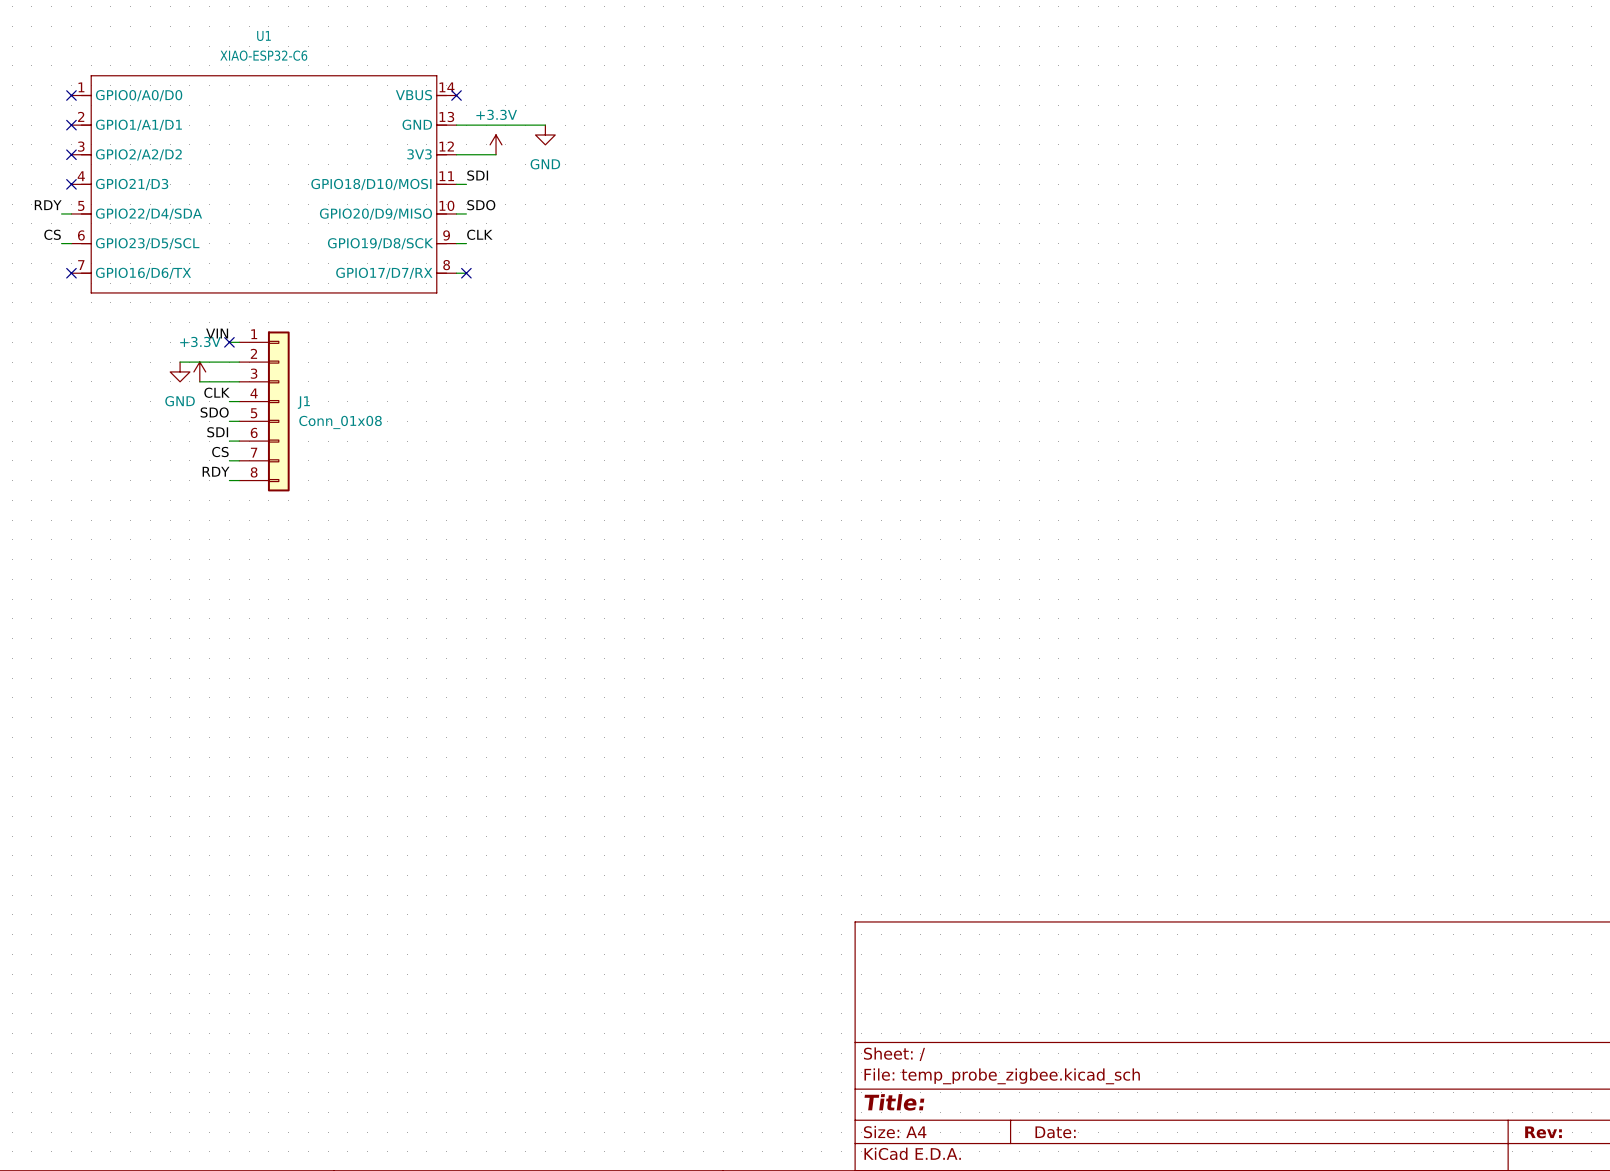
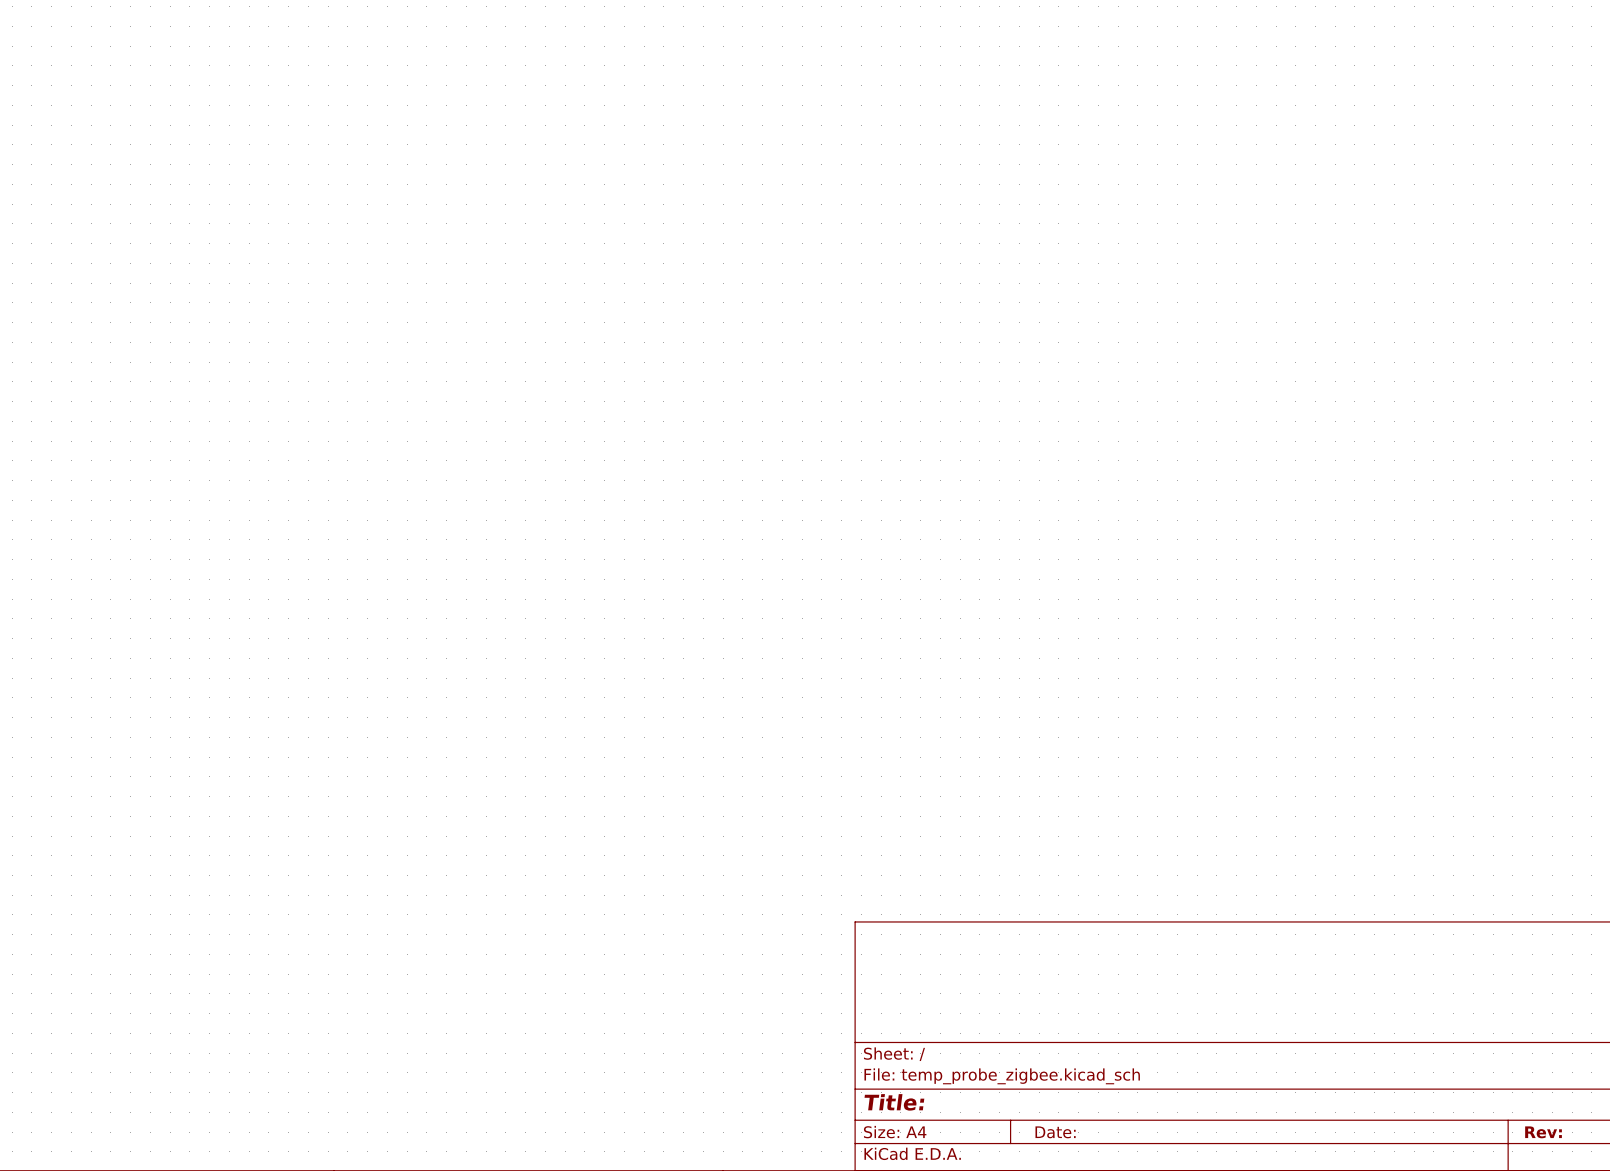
no-connect mark: (71, 95) -> none
no-connect mark: (456, 95) -> none
no-connect mark: (71, 125) -> none
wire: (456, 125) (545, 125) -> none
power symbol: GND (545, 135) -> none
power symbol: +3.3V (496, 144) -> none
no-connect mark: (71, 154) -> none
wire: (456, 154) (496, 154) -> none
label: SDI (477, 175) -> none
no-connect mark: (71, 184) -> none
U1: XIAO-ESP32-C6 (263, 184) -> none
wire: (456, 184) (466, 184) -> none
label: RDY (48, 205) -> none
label: SDO (481, 205) -> none
wire: (61, 213) (71, 213) -> none
wire: (456, 213) (466, 213) -> none
label: CS (52, 234) -> none
label: CLK (479, 234) -> none
wire: (61, 243) (71, 243) -> none
wire: (456, 243) (466, 243) -> none
no-connect mark: (71, 273) -> none
wire: (456, 273) (466, 273) -> none
no-connect mark: (466, 273) -> none
label: VIN (217, 333) -> none
wire: (229, 342) (239, 342) -> none
no-connect mark: (229, 342) -> none
wire: (180, 362) (239, 362) -> none
power symbol: GND (180, 371) -> none
power symbol: +3.3V (199, 371) -> none
wire: (199, 381) (239, 381) -> none
label: CLK (217, 392) -> none
wire: (229, 401) (239, 401) -> none
J1: Conn_01x08 (264, 411) -> none
label: SDO (214, 412) -> none
wire: (229, 421) (239, 421) -> none
label: SDI (217, 432) -> none
wire: (229, 441) (239, 441) -> none
label: CS (220, 452) -> none
wire: (229, 460) (239, 460) -> none
label: RDY (216, 471) -> none
wire: (229, 480) (239, 480) -> none

